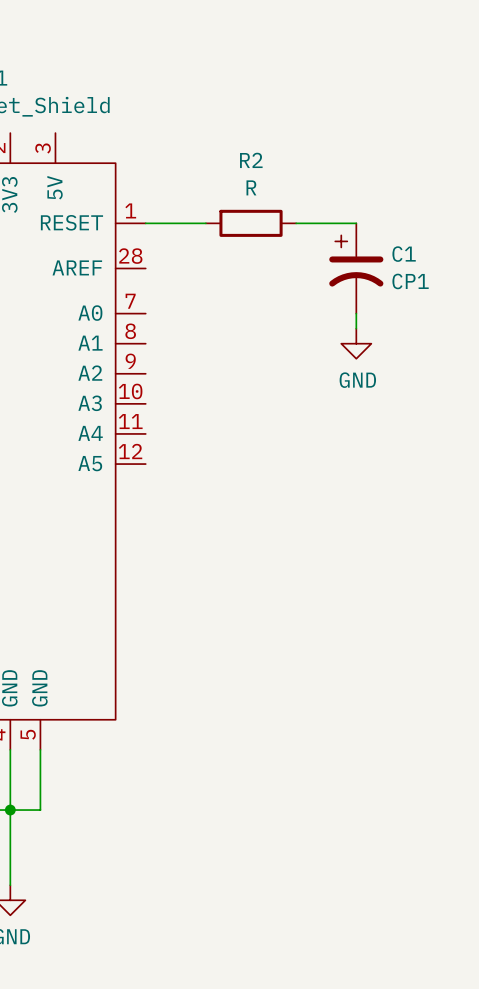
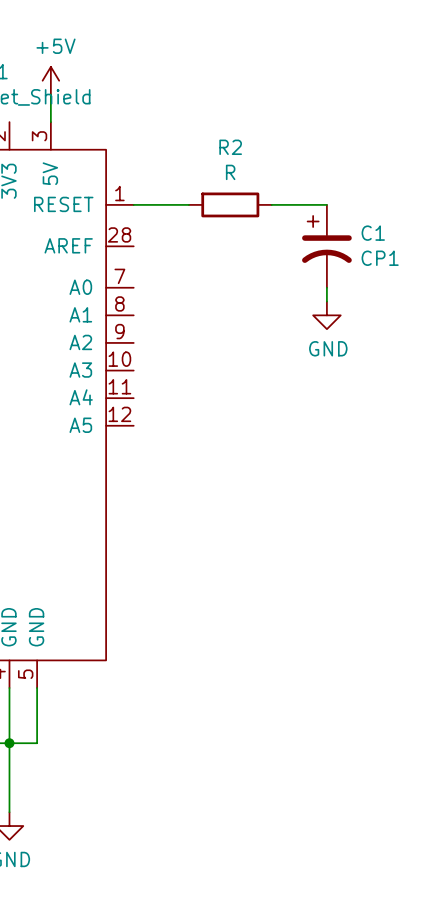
power symbol: none -> +5V (50, 80)
wire: none -> (50, 94) (50, 122)

